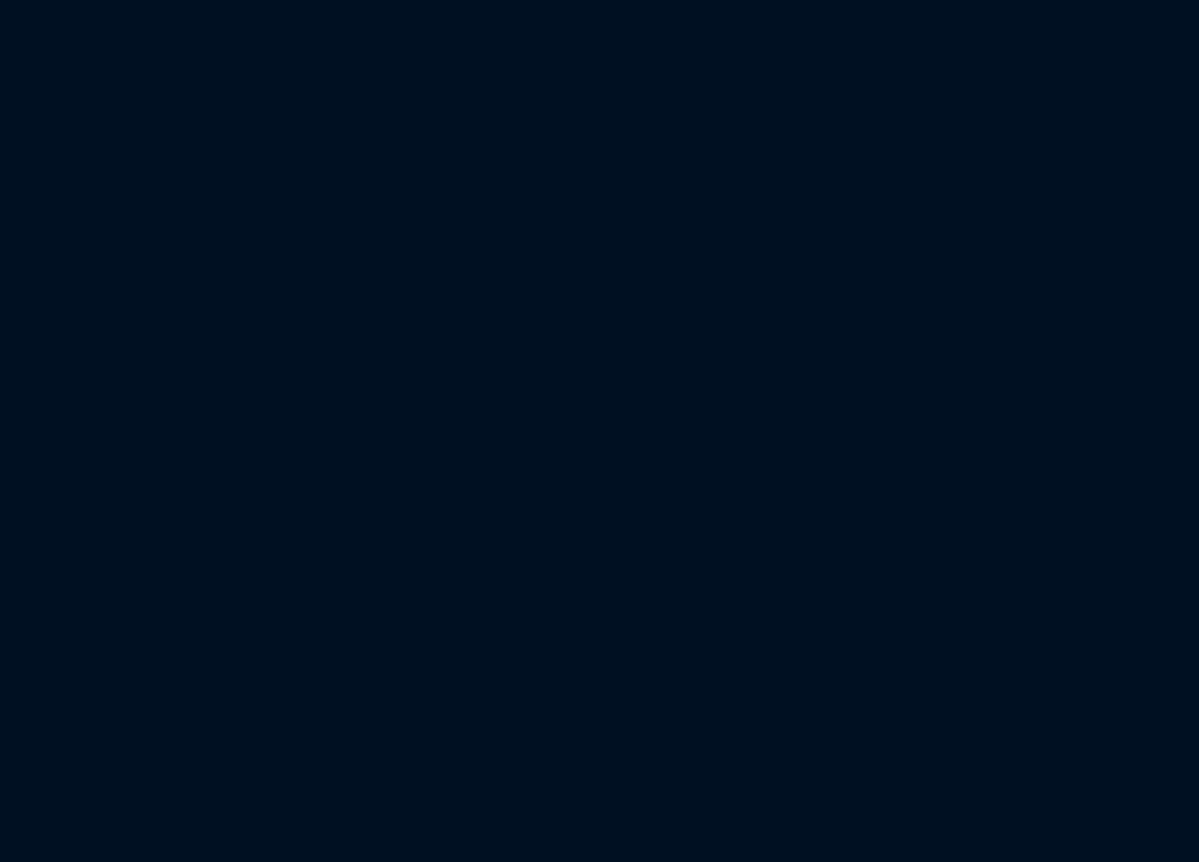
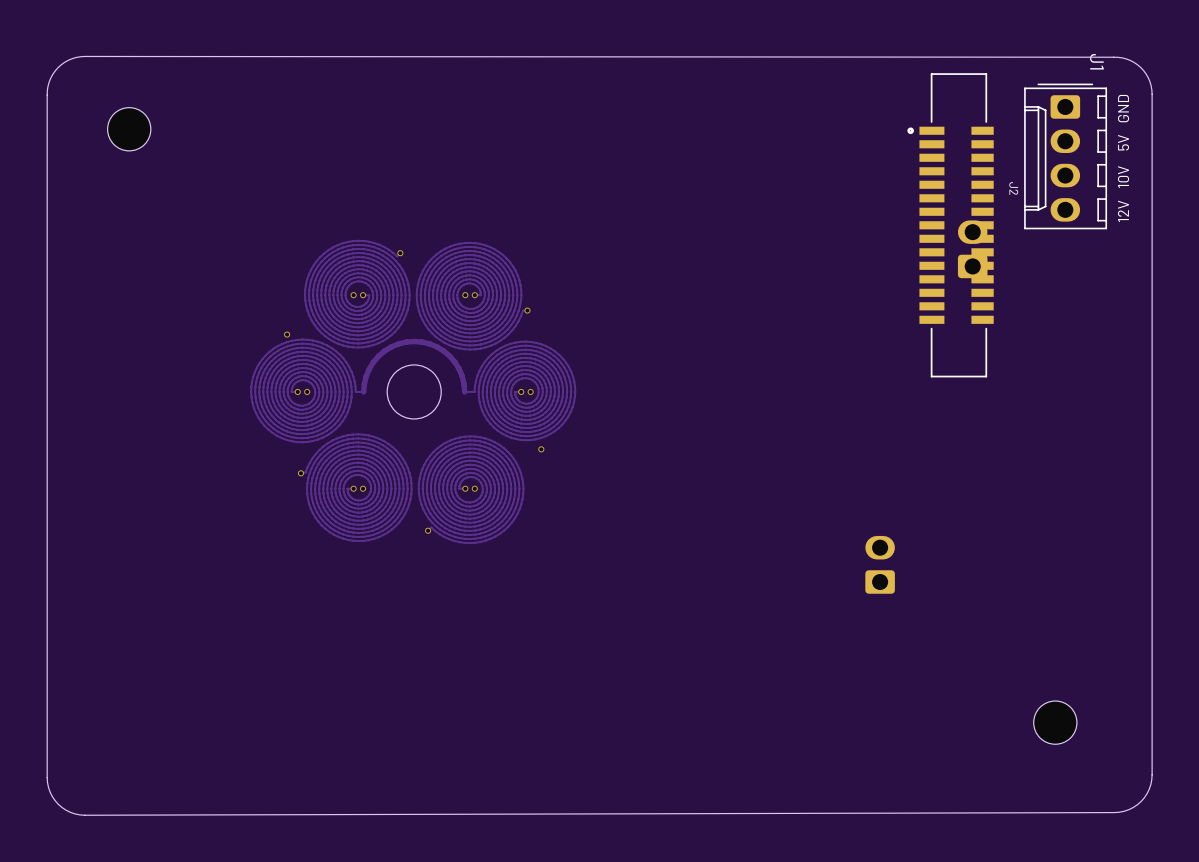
board edge: none -> (84, 56) (1113, 57) (1126, 58) (1137, 64) (1148, 77) (1152, 94) (1152, 774) (1150, 784) (1144, 797) (1133, 807) (1114, 812) (84, 815) (70, 812) (61, 807) (50, 791) (47, 777) (47, 94) (49, 82) (57, 67) (68, 60) (84, 56)
text: none -> GND (1123, 108)
part: none -> (129, 129)
text: none -> 5V (1123, 142)
J1: none -> (1065, 156)
text: none -> 10V (1123, 177)
text: none -> 12V (1123, 211)
J2: none -> (950, 225)
part: none -> (972, 249)
track: none -> (400, 253) (397, 256) (384, 246) (368, 241) (358, 240) (342, 243) (332, 247) (320, 257) (311, 269) (305, 284) (306, 305) (314, 324) (329, 339) (348, 346) (363, 347) (378, 343) (391, 335) (401, 323) (407, 310) (409, 295) (408, 284) (402, 269) (396, 261) (383, 251) (368, 245) (353, 245) (342, 247) (329, 254) (318, 265) (311, 279) (309, 295) (313, 315) (325, 331) (343, 341) (353, 343) (368, 342) (382, 336) (393, 327) (399, 318) (404, 305) (405, 289) (402, 279) (398, 270) (387, 258) (378, 253) (363, 249) (353, 249) (338, 253) (325, 262) (317, 275) (313, 290) (315, 310) (323, 323) (339, 335) (348, 338) (363, 339) (372, 336) (385, 329) (392, 322) (399, 309) (401, 295) (400, 284) (390, 266) (382, 260) (368, 254) (358, 252) (343, 255) (334, 260) (324, 271) (318, 285) (317, 300) (322, 314) (335, 328) (353, 335) (363, 334) (376, 330) (384, 324) (393, 313) (397, 299) (397, 290) (389, 271) (381, 264) (368, 258) (348, 258) (339, 262) (328, 272) (322, 285) (321, 300) (326, 313) (336, 324) (353, 331) (372, 328) (386, 316) (391, 308) (393, 295) (387, 276) (372, 263) (353, 261) (344, 264) (332, 273) (327, 281) (325, 295) (328, 308) (337, 319) (353, 327) (371, 324) (384, 312) (389, 295) (385, 281) (372, 268) (353, 265) (337, 274) (332, 281) (329, 295) (332, 308) (341, 318) (353, 322) (370, 319) (380, 311) (385, 295) (381, 281) (375, 274) (367, 270) (353, 269) (345, 272) (338, 278) (334, 286) (333, 295) (335, 303) (342, 313) (354, 318) (366, 317) (376, 310) (381, 295) (377, 282) (366, 274) (354, 273) (343, 280) (338, 287) (337, 295) (339, 303) (347, 312) (354, 314) (365, 313) (374, 305) (377, 295) (375, 287) (366, 278) (358, 277) (347, 281) (342, 287) (341, 295) (343, 302) (348, 307) (354, 310) (365, 309) (370, 304) (373, 295) (370, 287) (365, 282) (358, 281) (348, 285) (345, 295) (347, 301) (352, 305) (358, 306) (366, 303) (369, 295) (363, 295)
via: none -> (400, 253)
via: none -> (353, 295)
via: none -> (363, 295)
via: none -> (465, 295)
track: none -> (474, 295) (480, 295) (478, 287) (470, 283) (464, 284) (459, 288) (457, 295) (460, 304) (470, 309) (477, 307) (482, 302) (484, 295) (482, 285) (476, 281) (466, 279) (459, 282) (455, 287) (453, 295) (454, 302) (459, 308) (470, 313) (477, 311) (486, 303) (488, 295) (486, 284) (477, 277) (466, 275) (458, 278) (450, 287) (449, 295) (450, 303) (454, 310) (465, 316) (478, 315) (488, 307) (493, 295) (488, 280) (478, 272) (465, 271) (454, 276) (446, 286) (445, 295) (446, 303) (450, 311) (457, 317) (465, 320) (479, 319) (487, 315) (493, 308) (497, 295) (492, 279) (482, 270) (465, 267) (453, 272) (444, 282) (441, 295) (443, 308) (449, 316) (465, 324) (483, 322) (497, 309) (501, 295) (496, 278) (483, 266) (465, 263) (448, 270) (440, 281) (436, 295) (439, 309) (444, 317) (456, 325) (465, 328) (484, 326) (499, 313) (505, 295) (502, 281) (498, 273) (483, 262) (465, 259) (447, 266) (438, 276) (433, 290) (434, 304) (440, 318) (451, 327) (460, 331) (479, 332) (493, 325) (500, 318) (508, 300) (509, 290) (505, 276) (496, 265) (488, 259) (474, 255) (465, 255) (447, 261) (433, 276) (429, 290) (429, 305) (435, 318) (446, 329) (455, 334) (470, 337) (480, 336) (494, 330) (502, 323) (511, 305) (513, 295) (511, 280) (504, 267) (497, 260) (484, 253) (475, 251) (460, 251) (450, 255) (435, 267) (427, 280) (425, 300) (429, 314) (437, 327) (450, 336) (464, 341) (475, 341) (490, 337) (499, 331) (509, 320) (514, 310) (516, 300) (516, 285) (511, 271) (505, 263) (494, 253) (480, 248) (465, 247) (455, 249) (437, 258) (425, 275) (420, 295) (423, 310) (429, 324) (440, 335) (454, 342) (464, 345) (480, 344) (495, 339) (507, 329) (514, 320) (520, 305) (521, 295) (519, 280) (513, 266) (502, 255) (490, 247) (475, 243) (459, 243) (440, 251) (426, 265) (417, 284) (417, 305) (425, 325) (435, 336) (454, 347) (470, 349) (485, 347) (500, 340) (515, 325) (522, 311) (527, 310)
via: none -> (474, 295)
via: none -> (527, 310)
via: none -> (287, 334)
round board edge: none -> [386, 364, 442, 420]
via: none -> (297, 391)
via: none -> (307, 391)
track: none -> (521, 391) (515, 391) (517, 399) (525, 403) (532, 402) (536, 398) (538, 391) (535, 382) (525, 378) (518, 379) (513, 384) (511, 391) (514, 401) (519, 405) (529, 407) (536, 404) (540, 399) (542, 391) (541, 384) (536, 378) (525, 374) (518, 375) (509, 383) (507, 391) (509, 402) (518, 410) (529, 411) (537, 408) (545, 399) (546, 391) (545, 383) (541, 376) (530, 370) (517, 371) (507, 379) (502, 391) (508, 406) (517, 414) (530, 415) (541, 410) (549, 400) (550, 391) (549, 383) (545, 375) (538, 369) (530, 366) (516, 367) (508, 371) (502, 378) (498, 391) (503, 408) (513, 416) (530, 419) (542, 414) (551, 404) (554, 391) (552, 378) (546, 371) (530, 362) (512, 364) (498, 377) (494, 391) (499, 408) (512, 420) (530, 423) (547, 416) (555, 405) (559, 391) (556, 378) (551, 369) (535, 359) (516, 359) (499, 369) (491, 386) (493, 405) (500, 417) (508, 422) (525, 428) (544, 423) (555, 414) (561, 401) (562, 387) (558, 373) (548, 362) (540, 356) (520, 354) (506, 358) (498, 364) (488, 381) (487, 401) (493, 414) (499, 421) (511, 429) (521, 431) (540, 429) (556, 418) (564, 406) (567, 391) (564, 377) (557, 364) (549, 357) (536, 351) (525, 349) (510, 352) (501, 356) (487, 372) (484, 381) (482, 396) (486, 410) (491, 419) (502, 429) (511, 433) (525, 436) (535, 435) (553, 426) (563, 415) (570, 397) (570, 381) (564, 367) (554, 356) (541, 348) (531, 346) (515, 346) (505, 350) (492, 358) (486, 366) (480, 381) (478, 391) (480, 406) (484, 415) (493, 427) (506, 435) (520, 439) (531, 440) (550, 434) (565, 420) (574, 402) (575, 386) (568, 367) (555, 351) (536, 342) (520, 341) (505, 345) (491, 354) (479, 371) (474, 391) (464, 391) (462, 376) (449, 356) (429, 343) (414, 341) (398, 343) (378, 356) (366, 376) (363, 391) (355, 391) (351, 371) (339, 354) (322, 343) (302, 339) (287, 342) (273, 348) (262, 359) (254, 372) (251, 386) (252, 402) (255, 412) (264, 425) (272, 432) (286, 439) (302, 442) (317, 439) (327, 435) (339, 425) (347, 412) (351, 397) (350, 381) (342, 363) (326, 349) (307, 343) (297, 344) (282, 348) (270, 356) (261, 368) (257, 377) (255, 391) (256, 402) (262, 416) (269, 425) (282, 433) (292, 437) (307, 437) (317, 435) (331, 427) (341, 416) (346, 402) (347, 386) (340, 368) (330, 357) (312, 348) (302, 347) (287, 350) (279, 354) (268, 364) (263, 373) (259, 387) (260, 402) (264, 411) (278, 427) (287, 431) (302, 434) (312, 432) (326, 426) (333, 419) (341, 406) (343, 391) (340, 377) (332, 364) (316, 354) (297, 352) (288, 354) (276, 362) (269, 369) (264, 382) (264, 402) (275, 419) (283, 425) (297, 429) (316, 426) (325, 421) (334, 410) (339, 396) (338, 382) (331, 369) (320, 360) (302, 355) (284, 360) (277, 366) (269, 378) (267, 396) (276, 414) (292, 424) (312, 424) (327, 413) (332, 405) (335, 391) (332, 378) (323, 367) (307, 360) (289, 363) (276, 374) (271, 391) (275, 405) (288, 418) (307, 421) (323, 412) (328, 405) (331, 391) (328, 378) (319, 368) (306, 364) (289, 367) (280, 375) (275, 391) (279, 405) (285, 412) (293, 416) (306, 417) (315, 414) (321, 408) (326, 400) (327, 391) (325, 383) (318, 373) (306, 368) (294, 369) (284, 376) (279, 391) (283, 404) (293, 412) (306, 413) (317, 407) (322, 400) (323, 391) (321, 384) (313, 375) (306, 372) (294, 373) (286, 381) (283, 391) (285, 400) (294, 408) (302, 409) (313, 405) (317, 399) (319, 391) (317, 384) (312, 379) (306, 376) (295, 377) (290, 382) (287, 391) (289, 399) (295, 404) (302, 405) (311, 401) (315, 391) (313, 385) (308, 381) (302, 380) (294, 383) (291, 391) (297, 391)
via: none -> (521, 391)
via: none -> (530, 391)
via: none -> (541, 449)
track: none -> (300, 473) (305, 472) (312, 458) (327, 443) (342, 436) (358, 434) (374, 436) (392, 447) (403, 458) (410, 478) (410, 499) (402, 518) (387, 532) (368, 540) (353, 540) (338, 536) (325, 528) (315, 517) (309, 503) (307, 488) (308, 478) (314, 463) (320, 454) (333, 444) (347, 439) (363, 438) (373, 441) (387, 448) (398, 459) (405, 473) (407, 488) (403, 508) (390, 524) (373, 534) (363, 536) (348, 535) (334, 530) (322, 520) (317, 512) (311, 498) (311, 483) (313, 473) (318, 463) (329, 452) (338, 446) (353, 442) (363, 442) (378, 447) (390, 456) (399, 468) (403, 483) (400, 503) (393, 516) (377, 528) (368, 531) (353, 532) (343, 530) (331, 522) (324, 515) (317, 503) (315, 488) (316, 478) (326, 460) (334, 453) (348, 447) (358, 446) (373, 449) (382, 454) (392, 465) (398, 478) (399, 493) (394, 507) (381, 522) (363, 528) (353, 528) (339, 524) (332, 518) (323, 507) (319, 493) (319, 483) (327, 465) (334, 458) (348, 451) (368, 452) (377, 455) (388, 465) (394, 479) (395, 493) (390, 507) (380, 517) (363, 524) (344, 521) (330, 510) (325, 502) (323, 488) (329, 469) (344, 457) (363, 455) (372, 457) (383, 466) (388, 474) (391, 488) (388, 502) (379, 513) (362, 520) (345, 517) (331, 505) (327, 488) (330, 474) (344, 461) (363, 459) (379, 467) (384, 475) (387, 488) (383, 501) (375, 511) (362, 516) (345, 513) (336, 504) (331, 488) (335, 475) (341, 468) (349, 464) (362, 463) (371, 466) (377, 472) (382, 480) (383, 488) (381, 497) (374, 507) (362, 512) (350, 511) (340, 503) (335, 488) (339, 476) (349, 468) (362, 467) (373, 473) (377, 480) (379, 488) (377, 496) (369, 505) (362, 508) (350, 506) (342, 499) (339, 488) (341, 480) (350, 472) (358, 470) (369, 475) (373, 481) (375, 488) (373, 495) (368, 501) (361, 504) (351, 502) (346, 498) (343, 488) (345, 481) (351, 476) (358, 474) (367, 479) (371, 488) (369, 494) (364, 499) (358, 500) (350, 496) (347, 488) (353, 488)
via: none -> (300, 473)
via: none -> (353, 488)
via: none -> (363, 488)
track: none -> (465, 488) (459, 488) (462, 480) (470, 476) (476, 478) (480, 482) (482, 488) (479, 498) (470, 502) (462, 501) (457, 495) (455, 488) (458, 479) (463, 474) (473, 473) (480, 475) (485, 481) (486, 488) (485, 496) (480, 502) (470, 506) (462, 505) (453, 496) (451, 488) (454, 478) (462, 470) (473, 469) (481, 471) (489, 480) (491, 488) (489, 496) (485, 503) (474, 510) (461, 509) (451, 501) (447, 488) (452, 473) (461, 466) (474, 465) (485, 470) (493, 480) (495, 488) (493, 497) (489, 505) (482, 510) (474, 514) (461, 513) (453, 508) (446, 502) (443, 488) (447, 472) (457, 464) (474, 460) (486, 465) (495, 475) (499, 488) (496, 502) (490, 509) (474, 518) (456, 515) (442, 502) (439, 488) (443, 471) (456, 459) (474, 456) (491, 464) (499, 475) (503, 488) (500, 502) (495, 510) (484, 519) (474, 522) (455, 519) (440, 507) (434, 488) (437, 475) (441, 467) (456, 455) (474, 452) (492, 459) (501, 470) (506, 483) (506, 498) (499, 511) (488, 521) (479, 525) (460, 525) (446, 519) (439, 512) (431, 493) (431, 483) (435, 470) (443, 459) (451, 453) (465, 448) (474, 448) (493, 455) (506, 469) (510, 483) (510, 498) (504, 512) (493, 523) (484, 527) (470, 530) (459, 529) (445, 523) (438, 517) (428, 499) (426, 488) (429, 474) (435, 461) (442, 454) (455, 447) (465, 444) (479, 445) (489, 448) (505, 460) (512, 473) (515, 493) (511, 508) (502, 521) (490, 530) (475, 534) (464, 534) (449, 530) (440, 525) (430, 513) (425, 504) (423, 494) (423, 478) (428, 464) (434, 456) (446, 447) (460, 441) (475, 440) (485, 442) (502, 452) (514, 468) (519, 488) (517, 504) (510, 517) (499, 529) (485, 536) (475, 538) (459, 538) (444, 532) (432, 522) (425, 514) (420, 499) (418, 488) (420, 473) (427, 460) (437, 448) (450, 440) (464, 436) (480, 437) (499, 444) (514, 459) (522, 478) (522, 499) (517, 514) (508, 526) (495, 536) (485, 540) (470, 543) (459, 542) (444, 536) (431, 527) (428, 530)
via: none -> (465, 488)
via: none -> (474, 488)
via: none -> (428, 530)
part: none -> (880, 564)
part: none -> (1055, 722)

